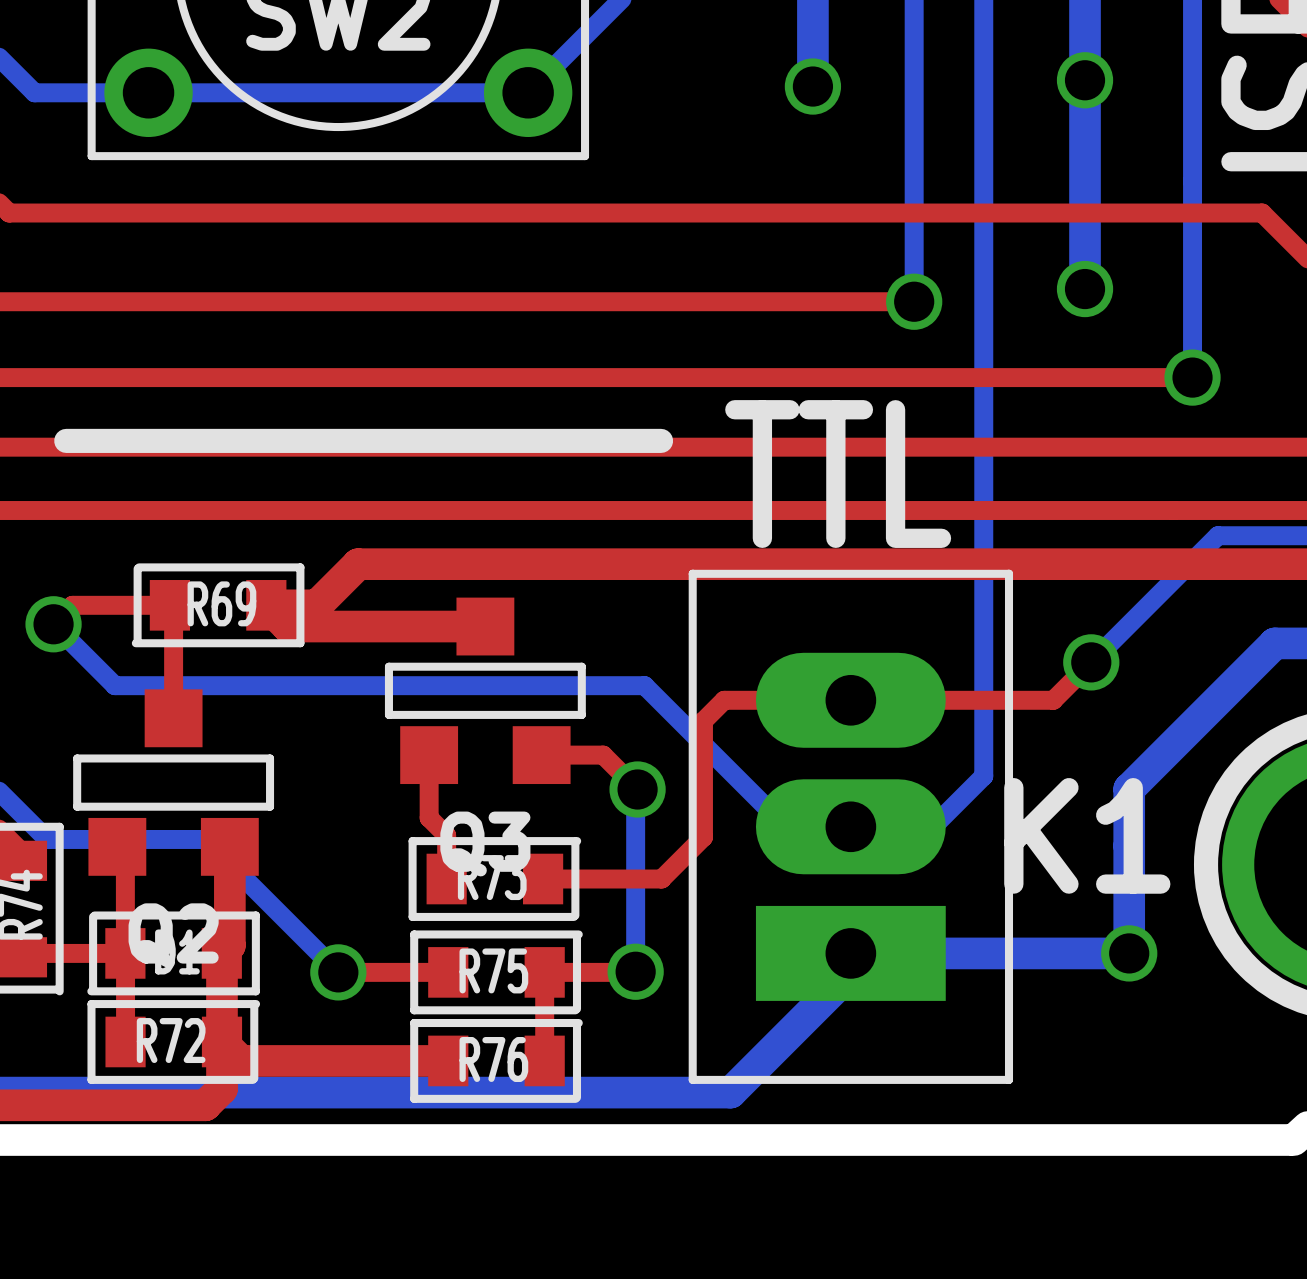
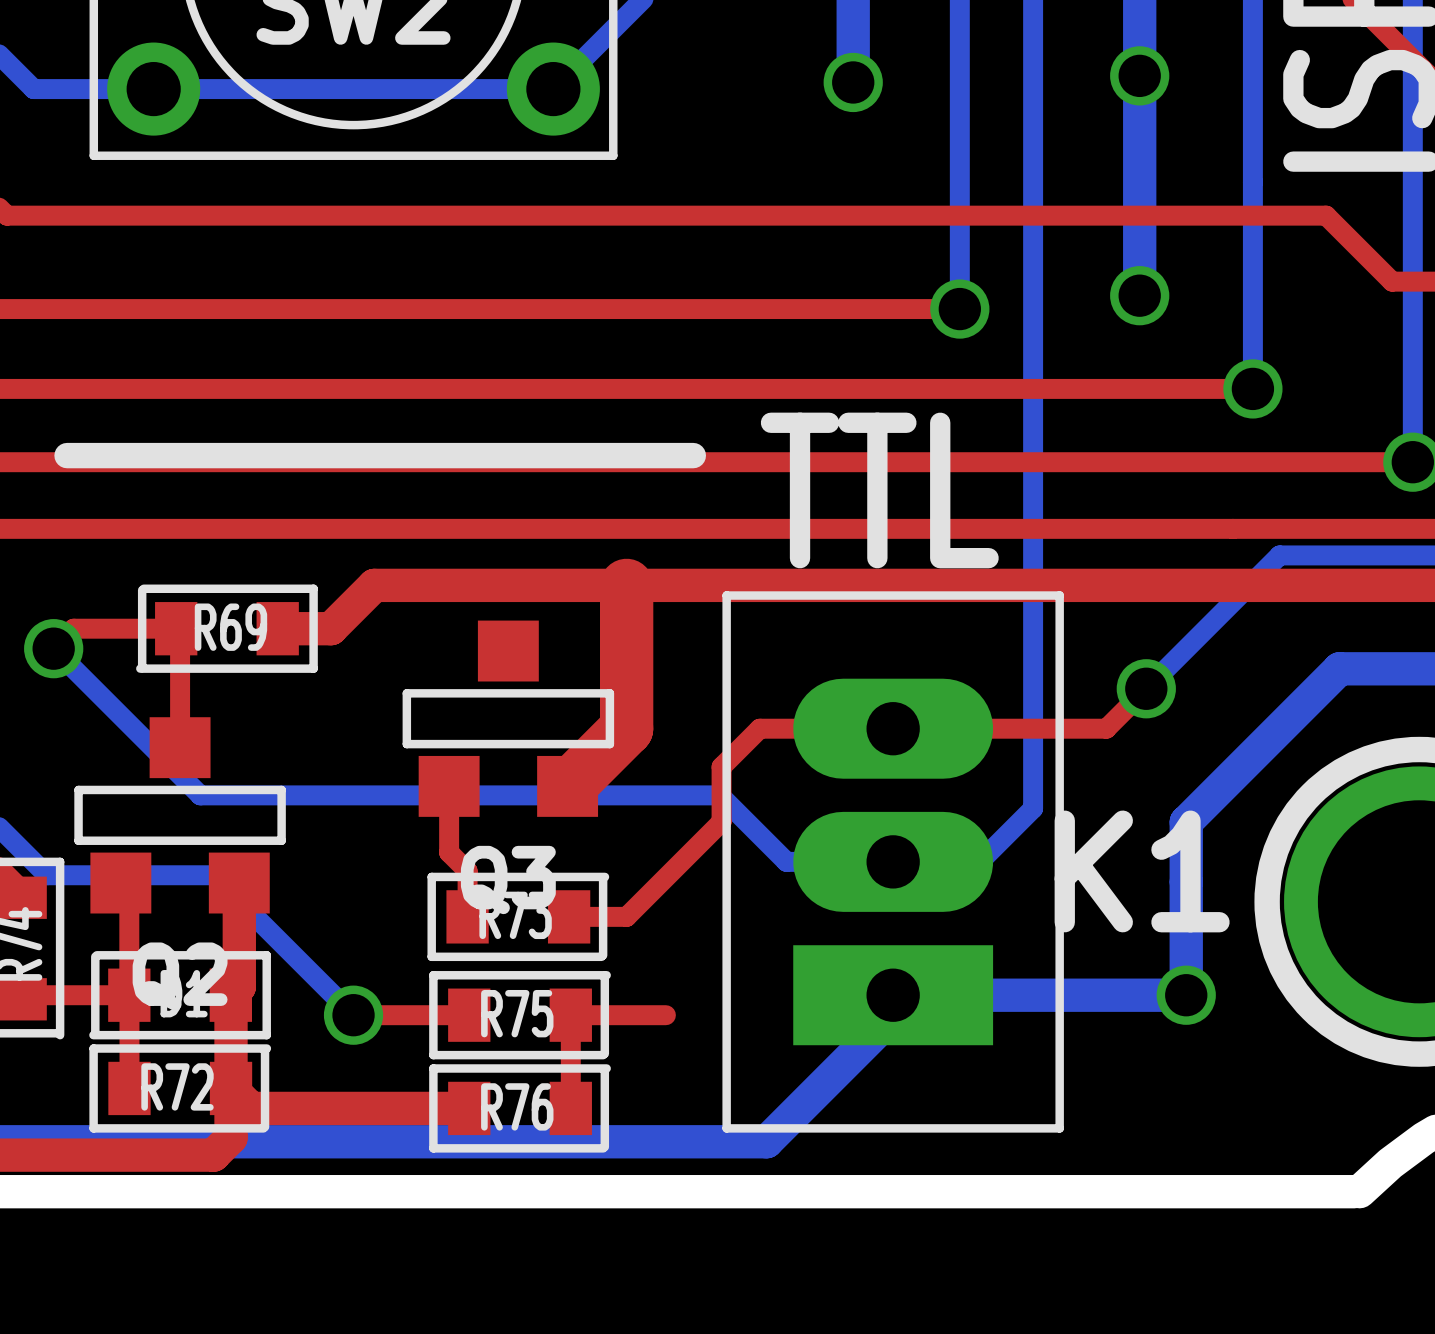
top track: (266, 605) (287, 626) (485, 626) -> none
bottom track: (114, 685) (644, 685) (785, 826) -> (118, 713) (200, 795) (720, 795) (786, 861) (824, 861)
top track: (703, 721) (703, 837) (661, 879) (597, 879) -> (737, 750) (721, 766) (721, 821) (626, 916)
top track: (541, 755) (603, 755) (637, 789) -> (568, 786) (626, 728) (626, 585)
bottom track: (637, 789) (635, 791) (635, 971) -> none
via: (637, 789) -> none
via: (635, 971) -> none

